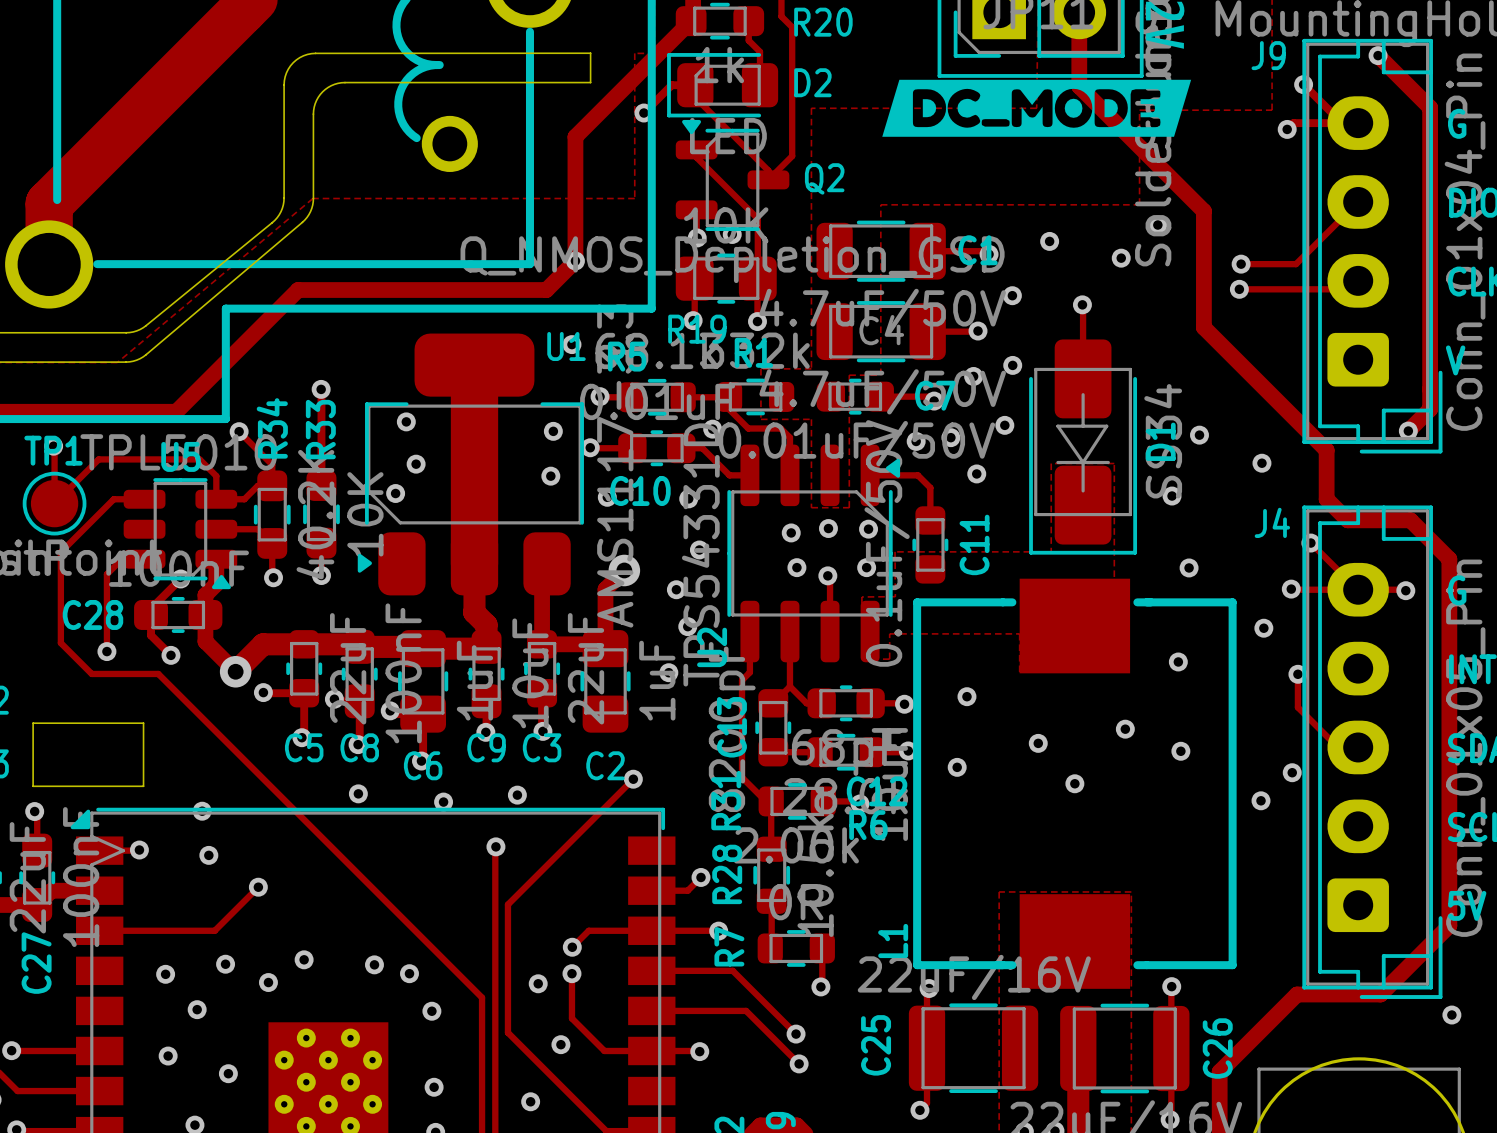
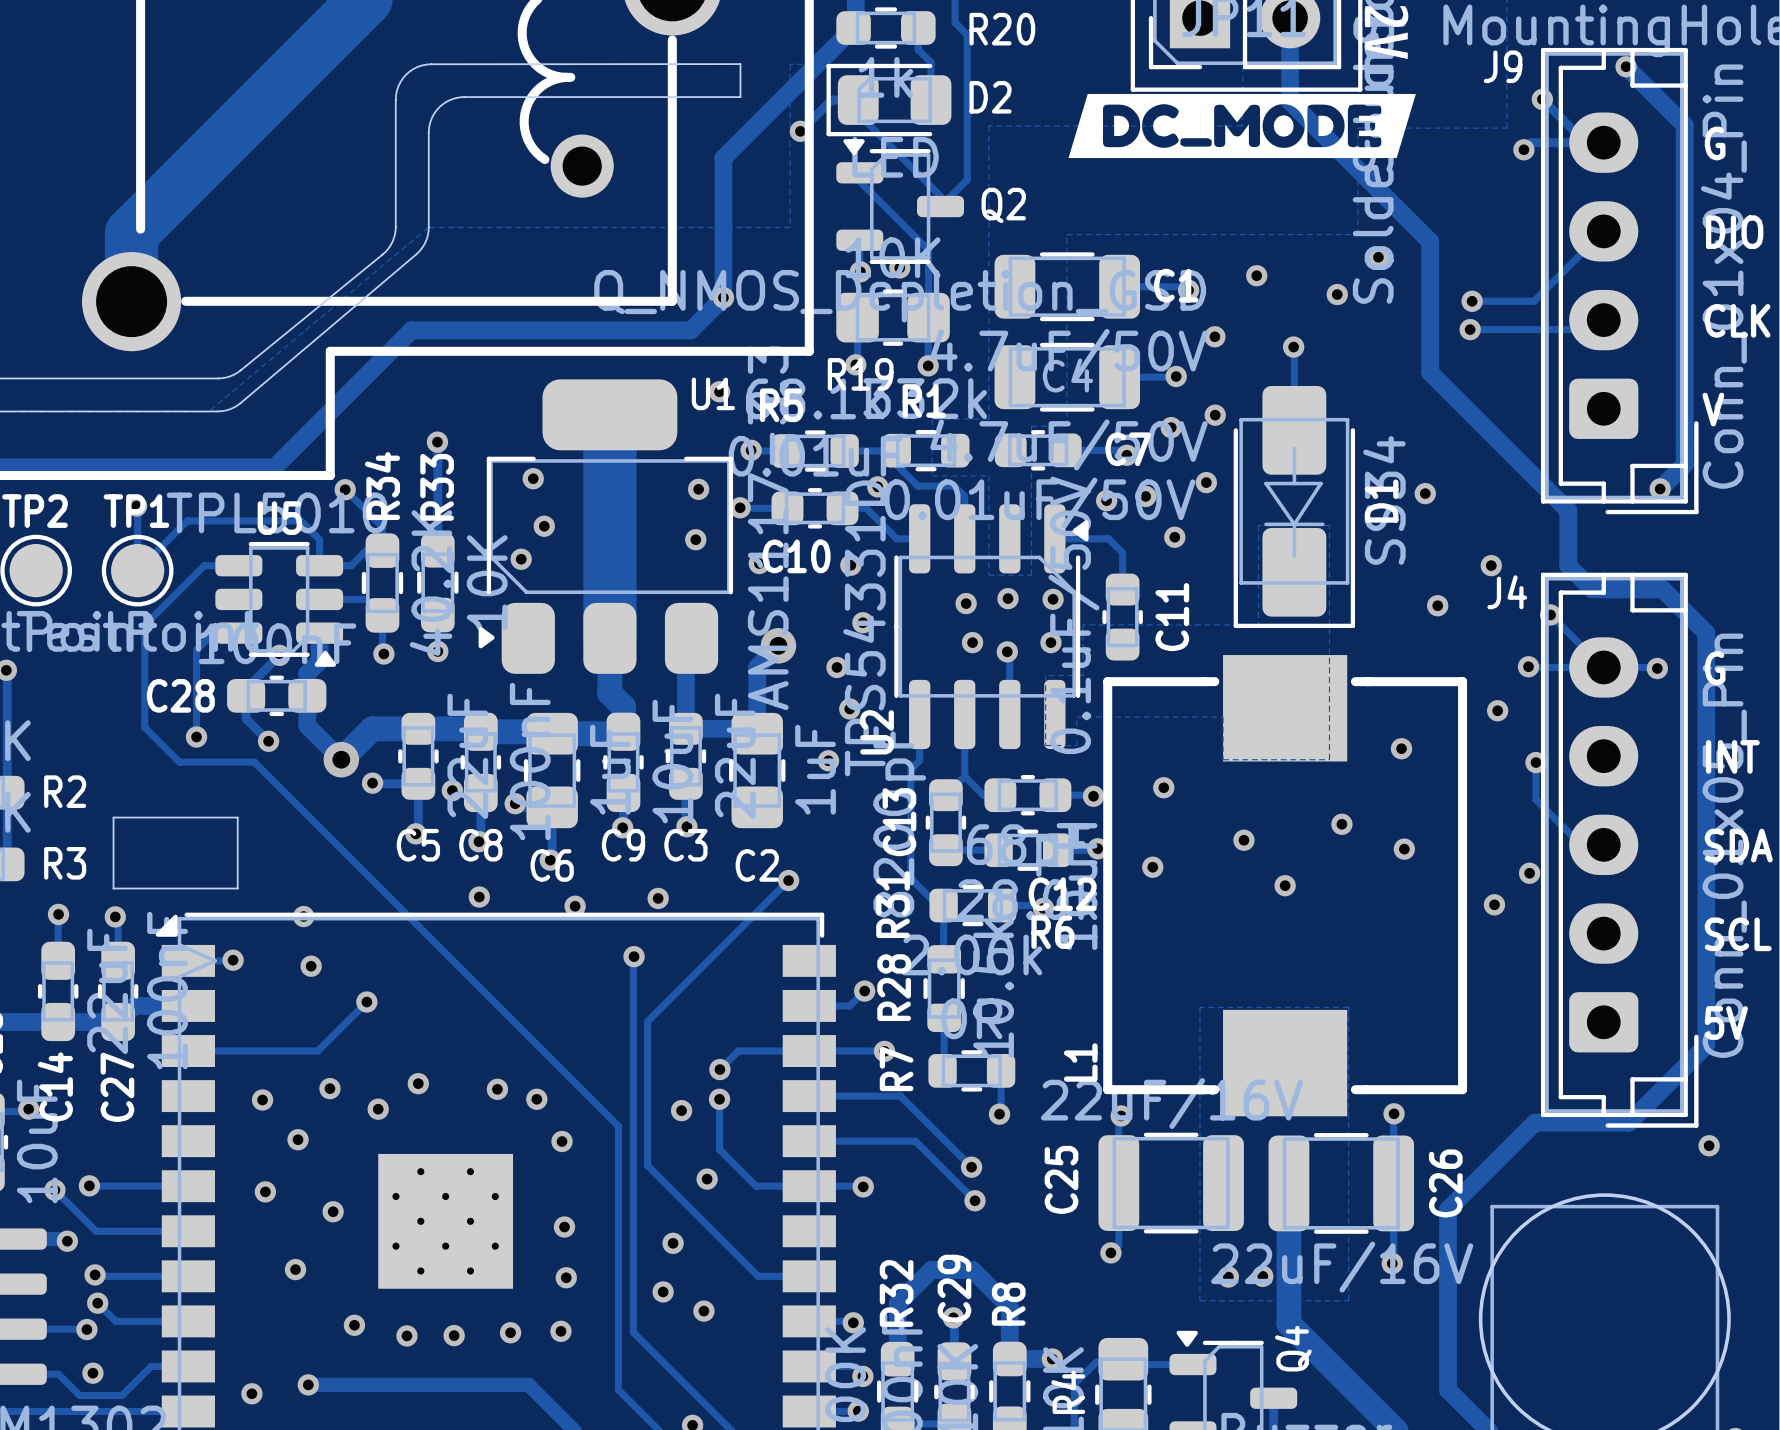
via position: (1261, 463) -> (1491, 565)
via: (1172, 496) -> none
via: none -> (1437, 605)
via: (1189, 567) -> none

